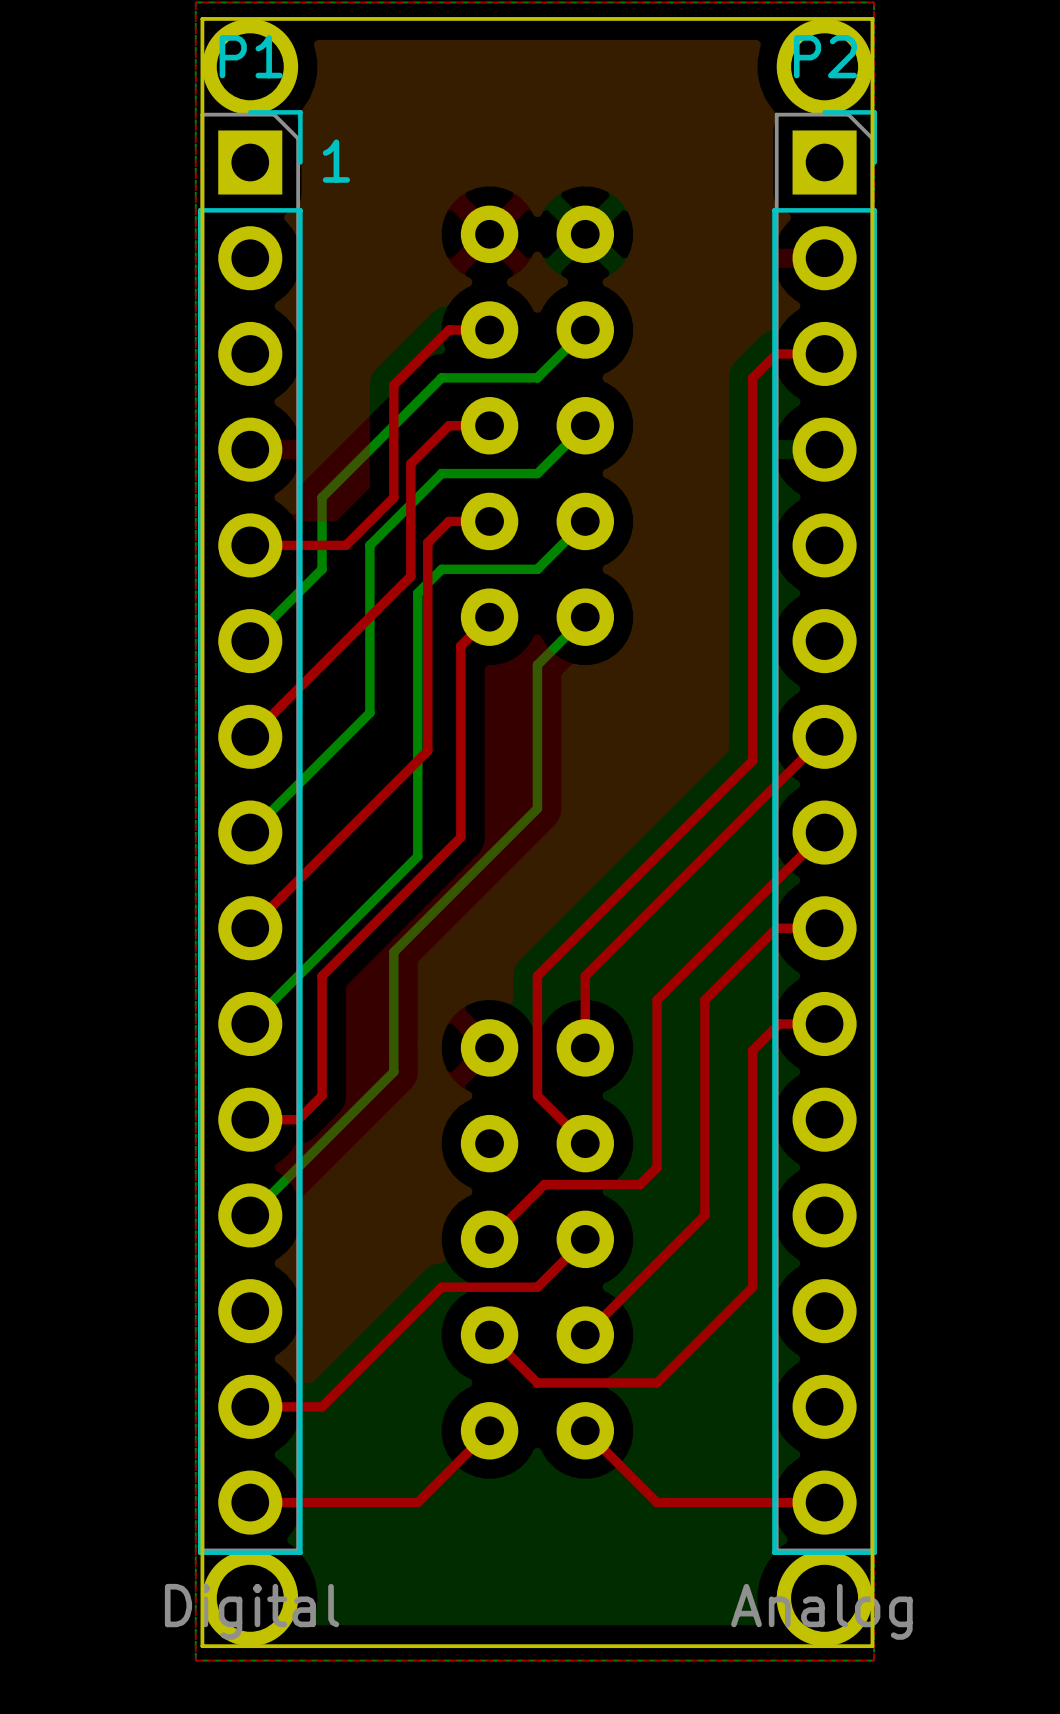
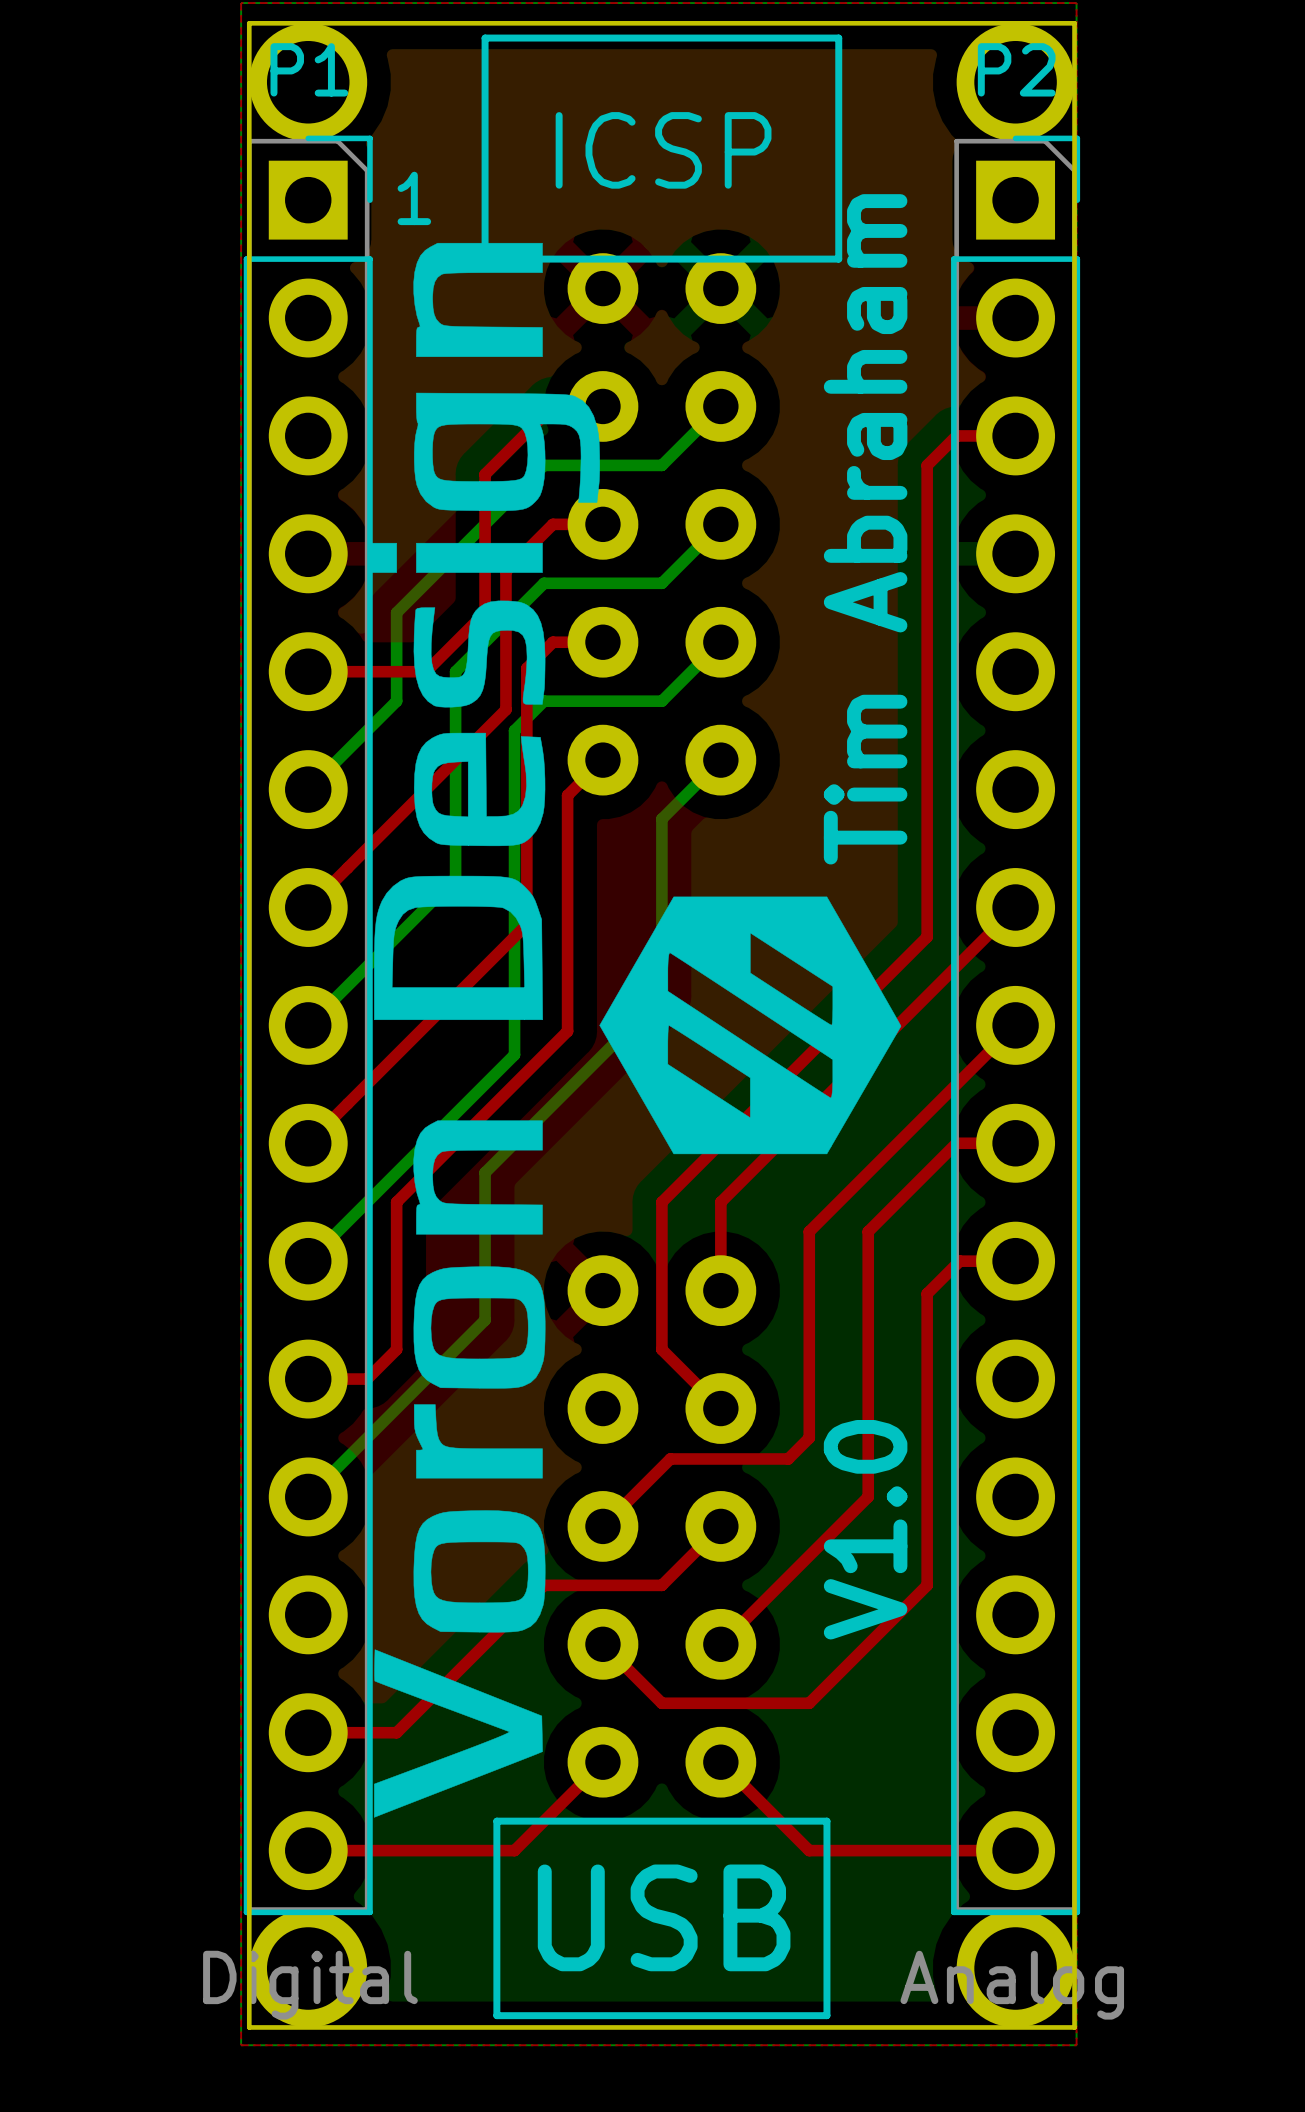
line: none -> (485, 38) (838, 38) (838, 259) (485, 259) (485, 38)
text: none -> ICSP (663, 150)
drawing: none -> [371, 242, 902, 1818]
text: none -> Tim Abraham (865, 529)
text: none -> V1.0 (865, 1529)
line: none -> (496, 1821) (826, 1821) (826, 2015) (496, 2015) (496, 1821)
text: none -> USB (664, 1917)

